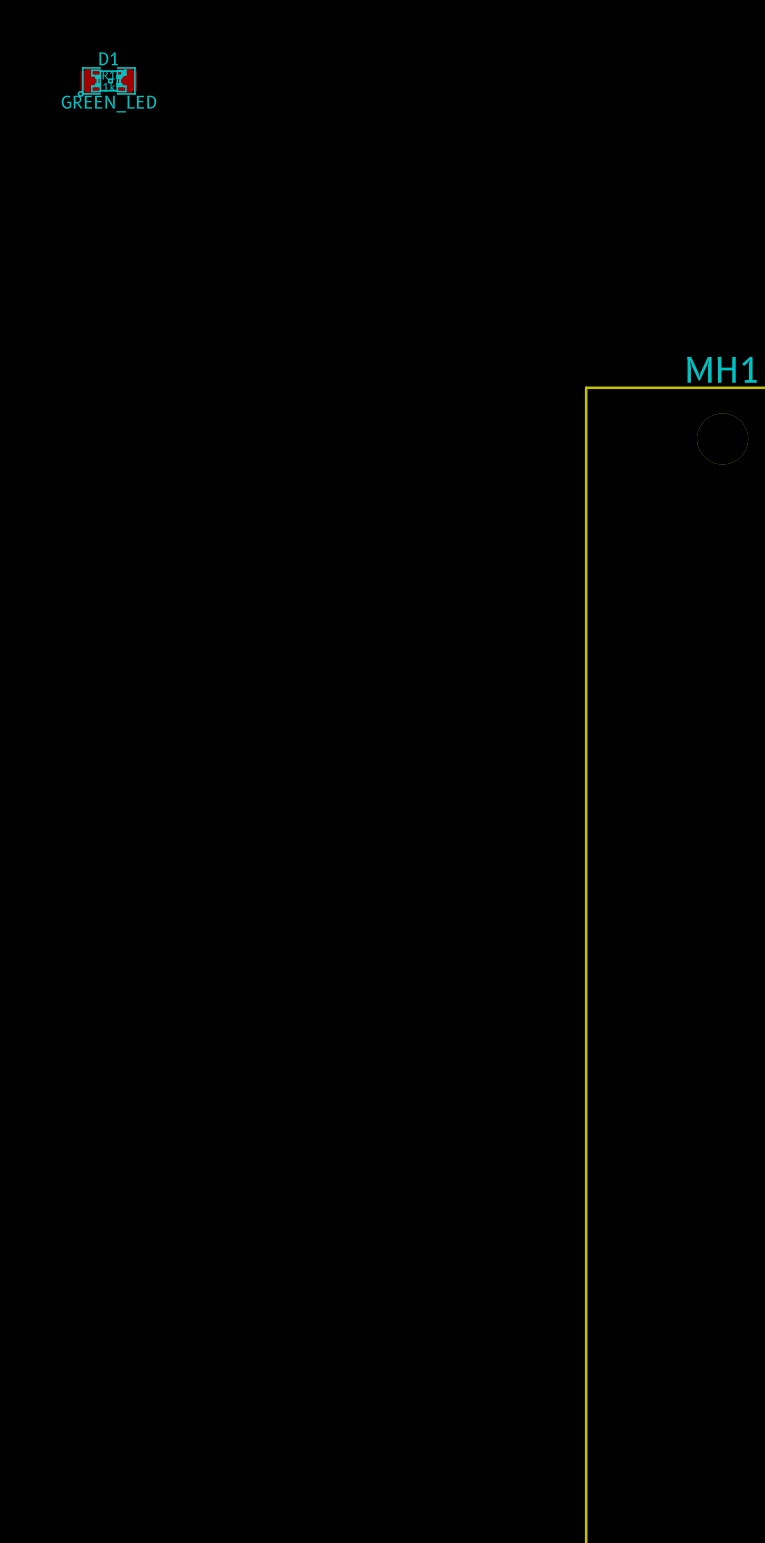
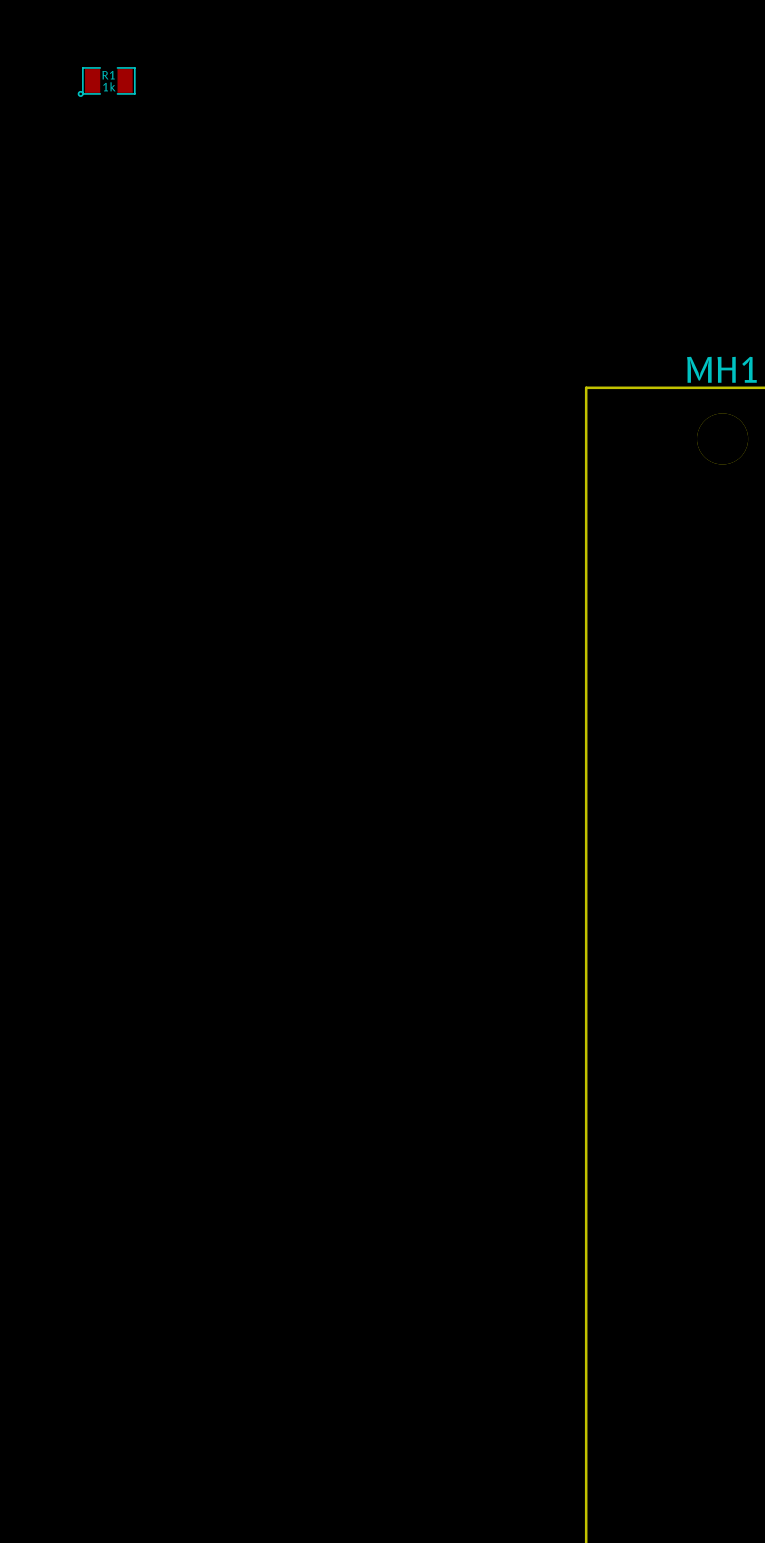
D1: GREEN_LED (108, 80) -> none

